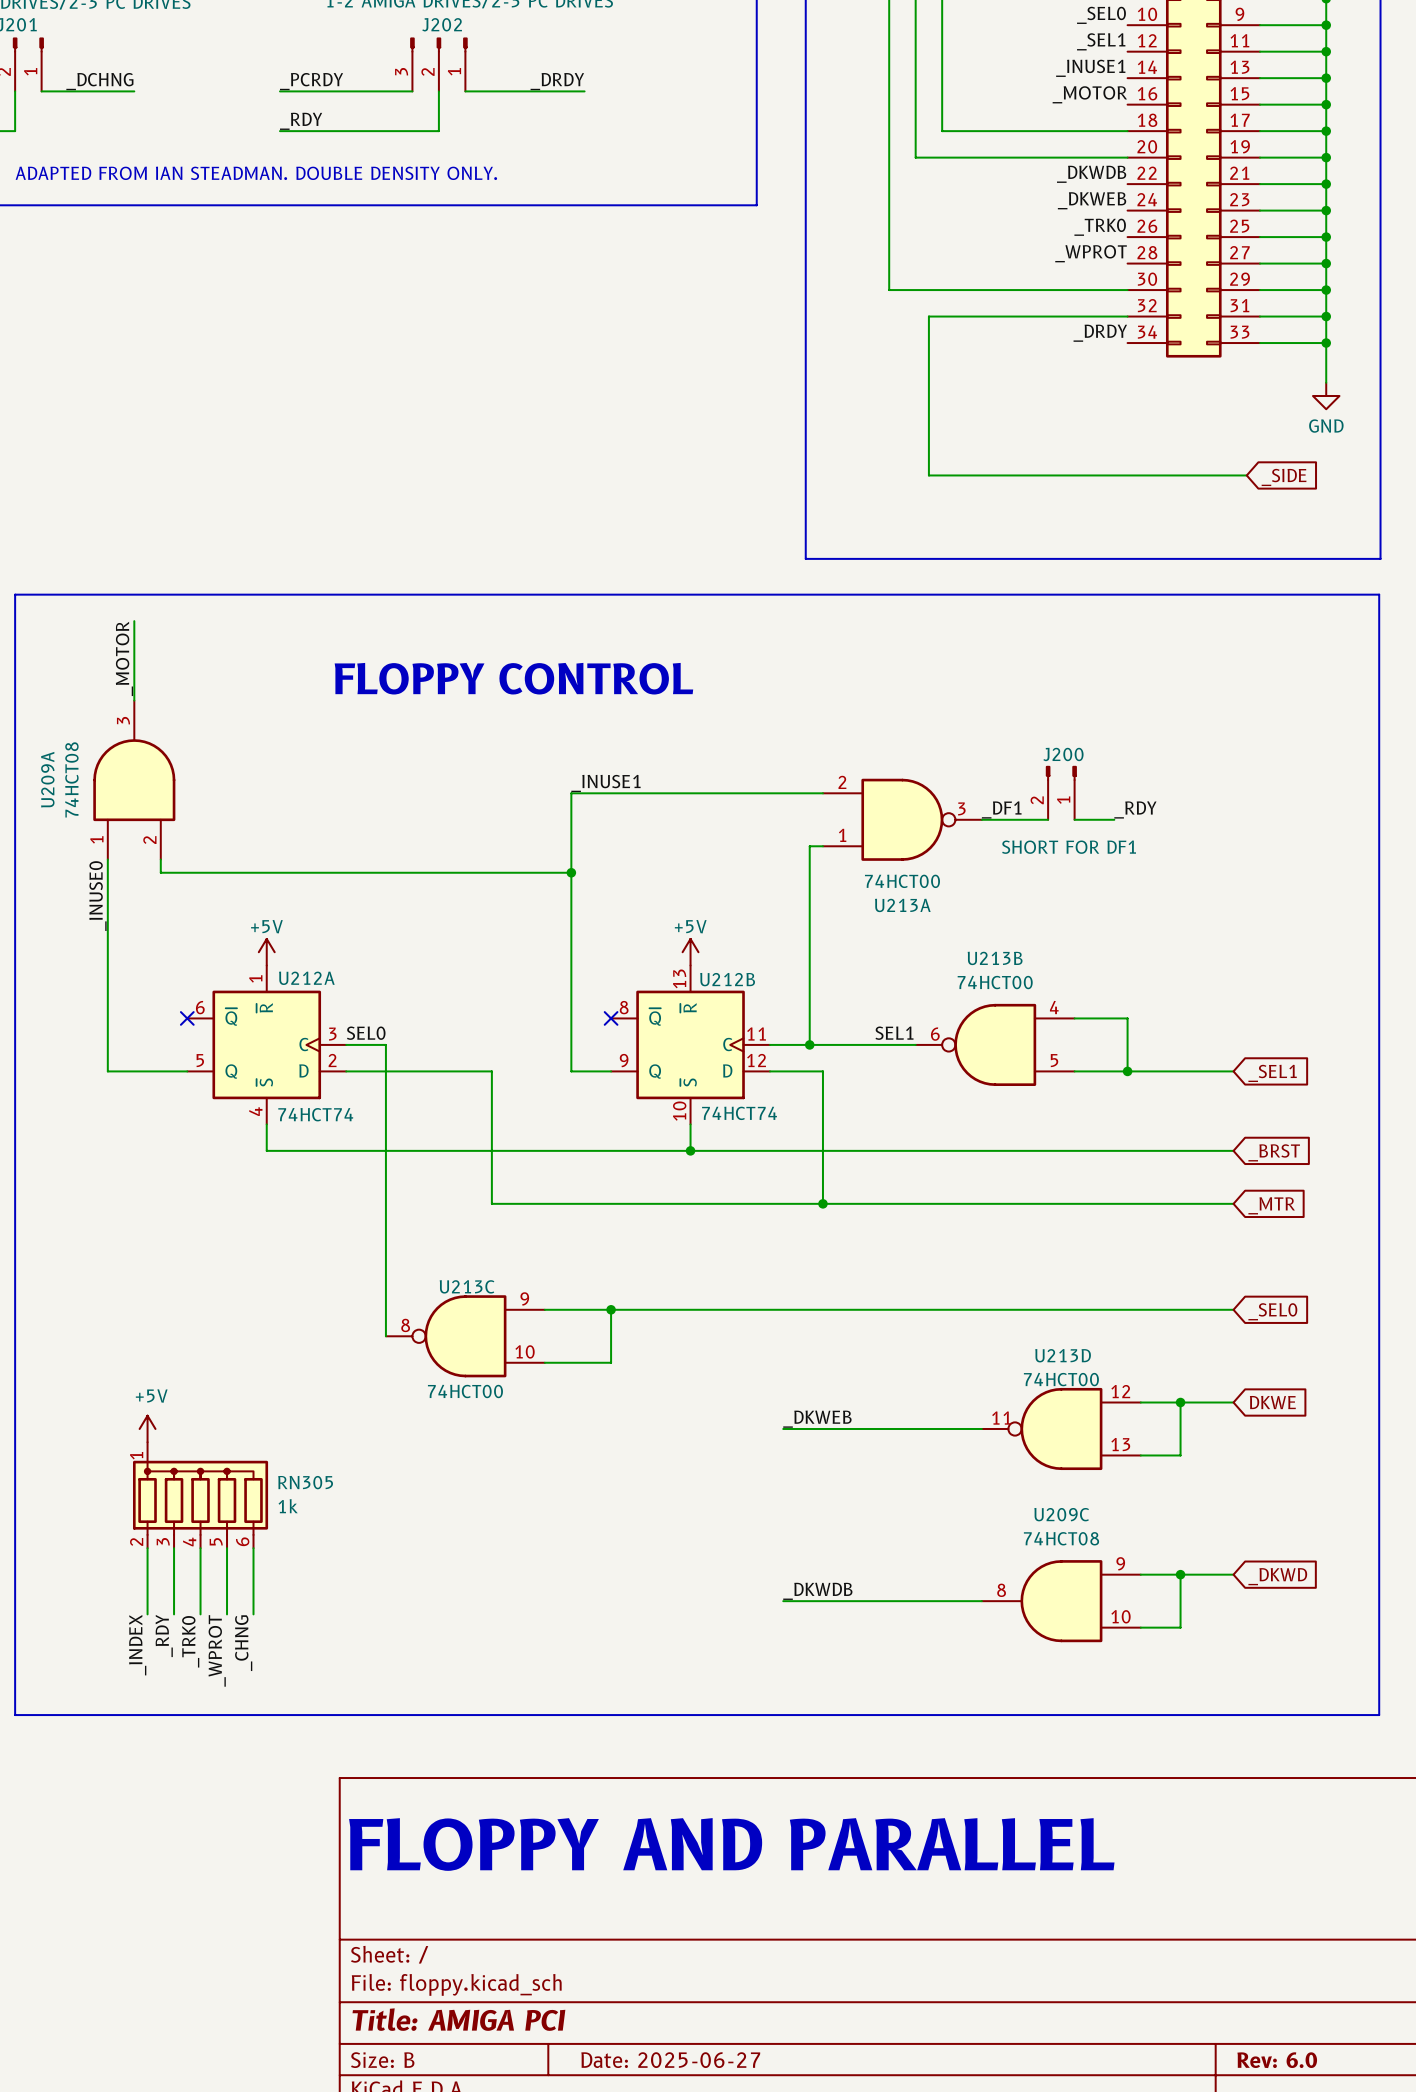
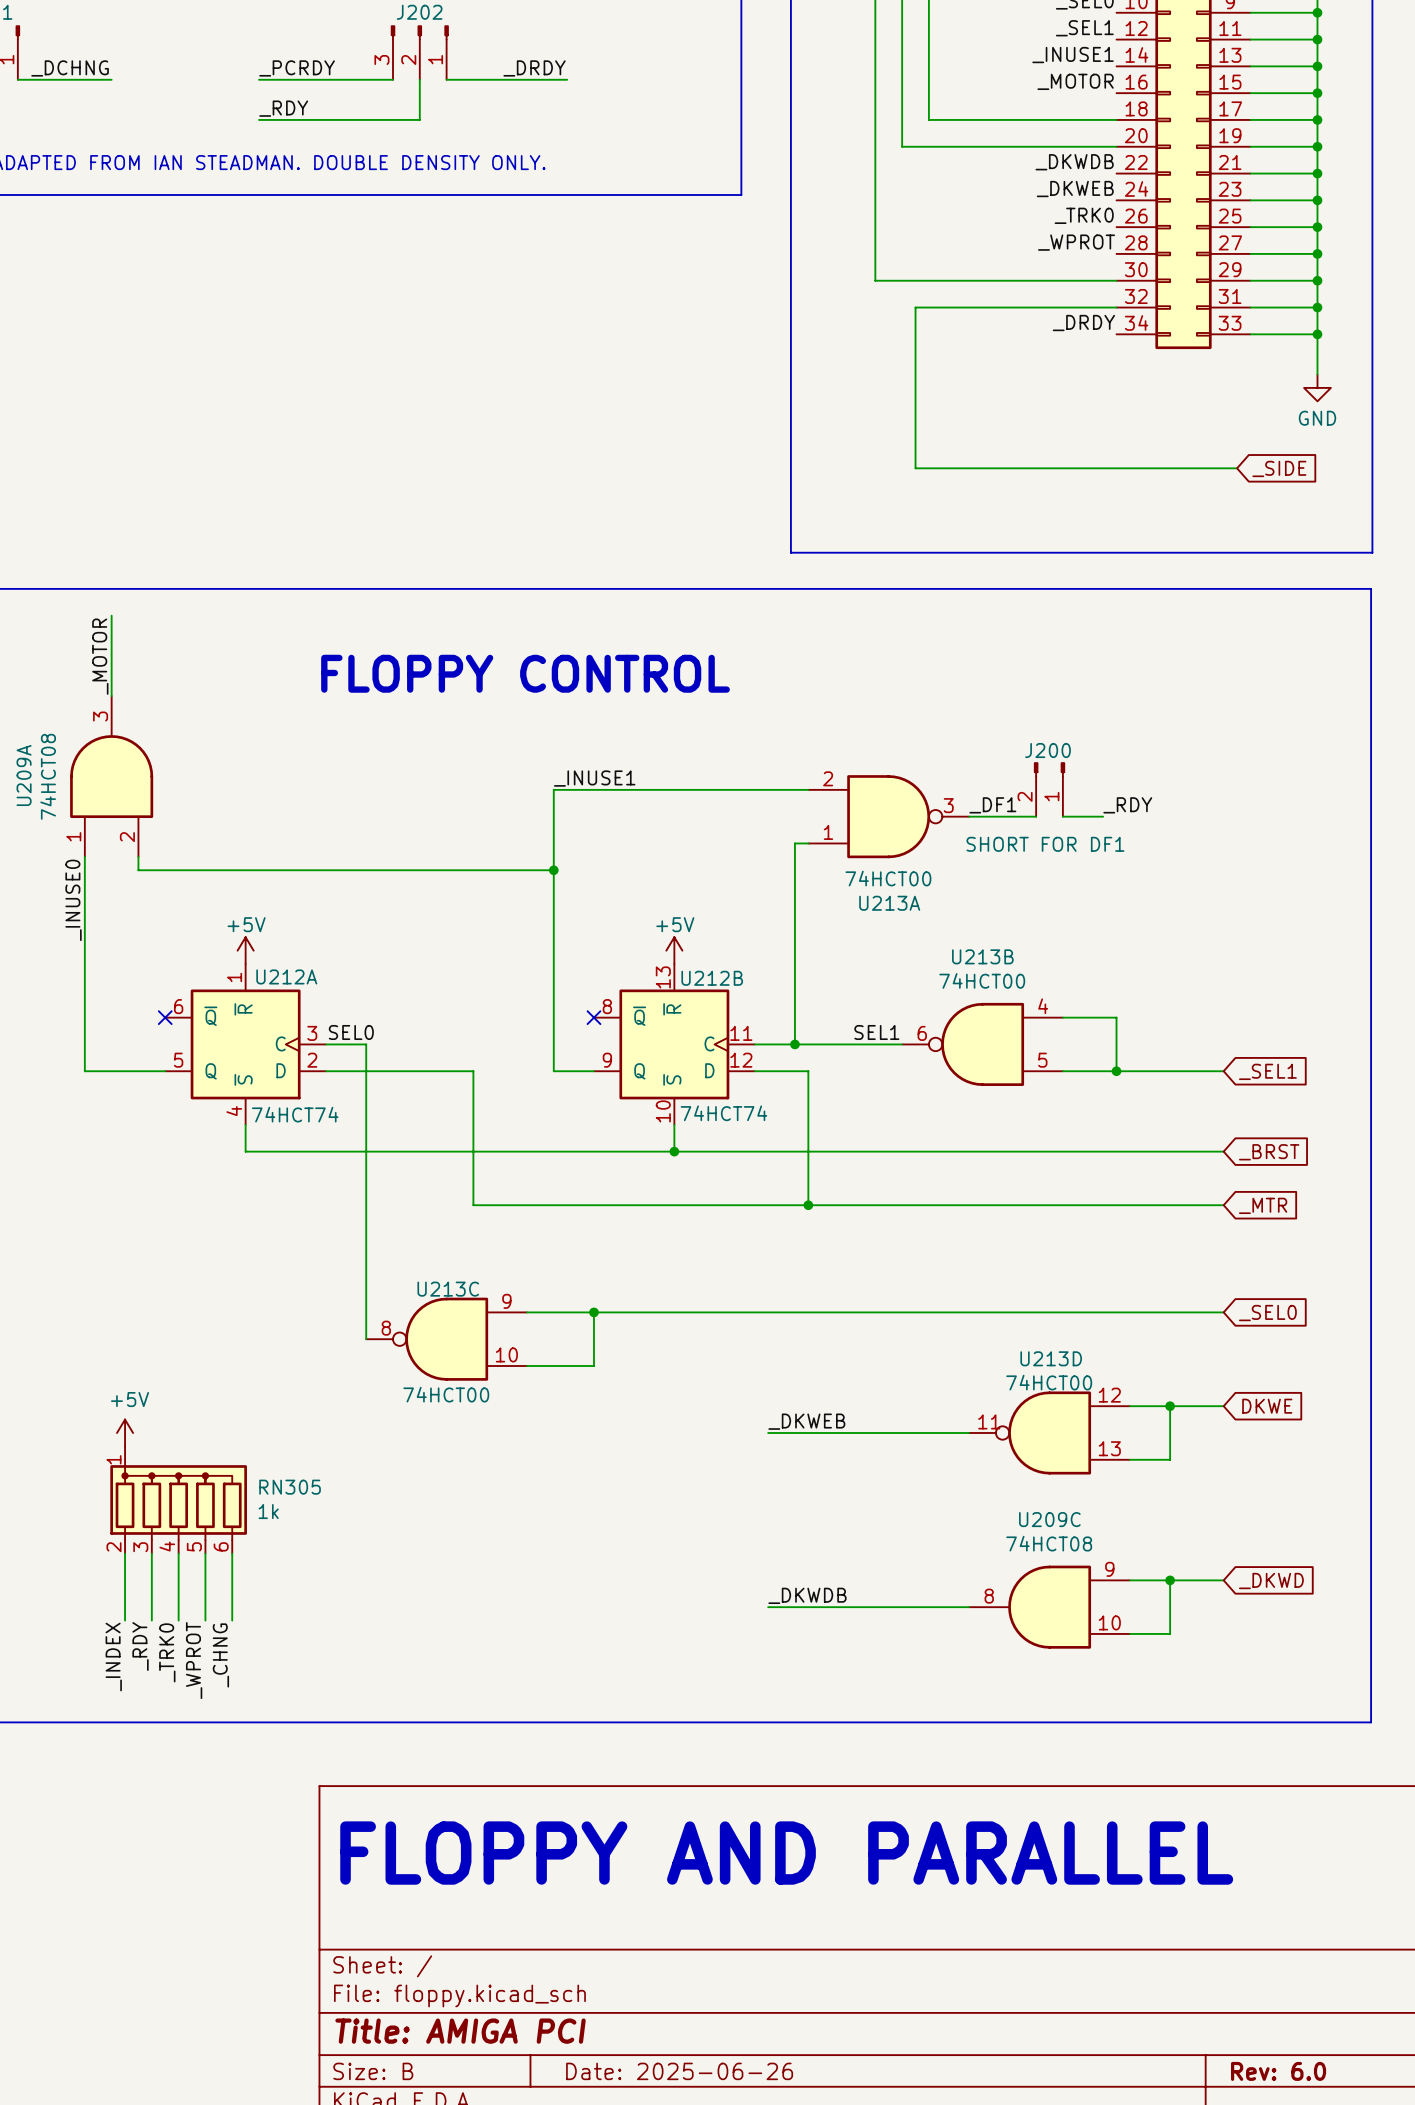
title block: Date: 2025-06-27 (670, 2060) -> Date: 2025-06-26 (679, 2071)

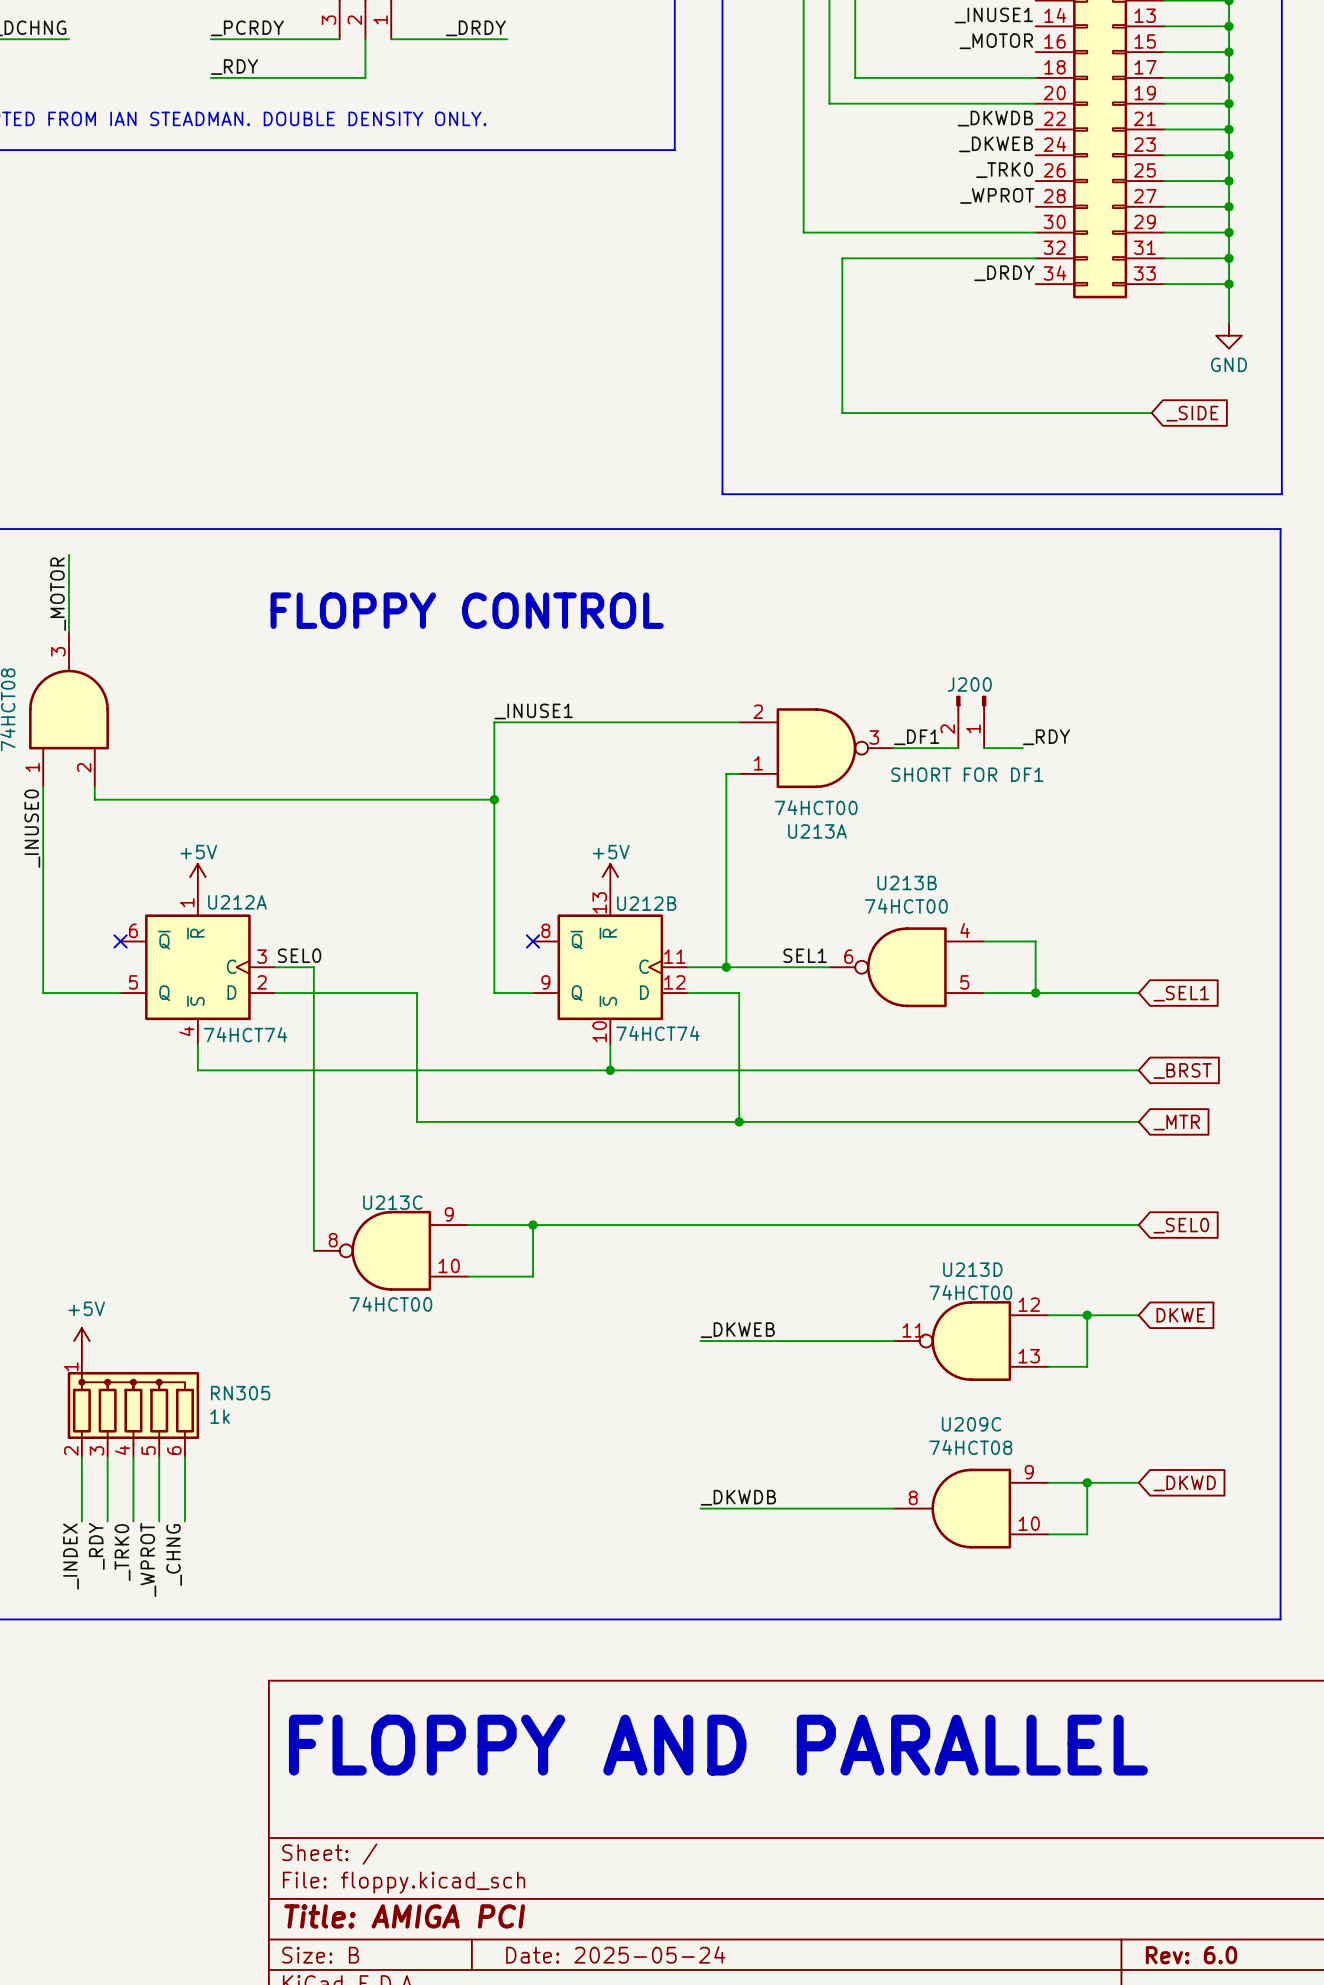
title block: Date: 2025-06-26 (679, 2071) -> Date: 2025-05-24 (615, 1954)

